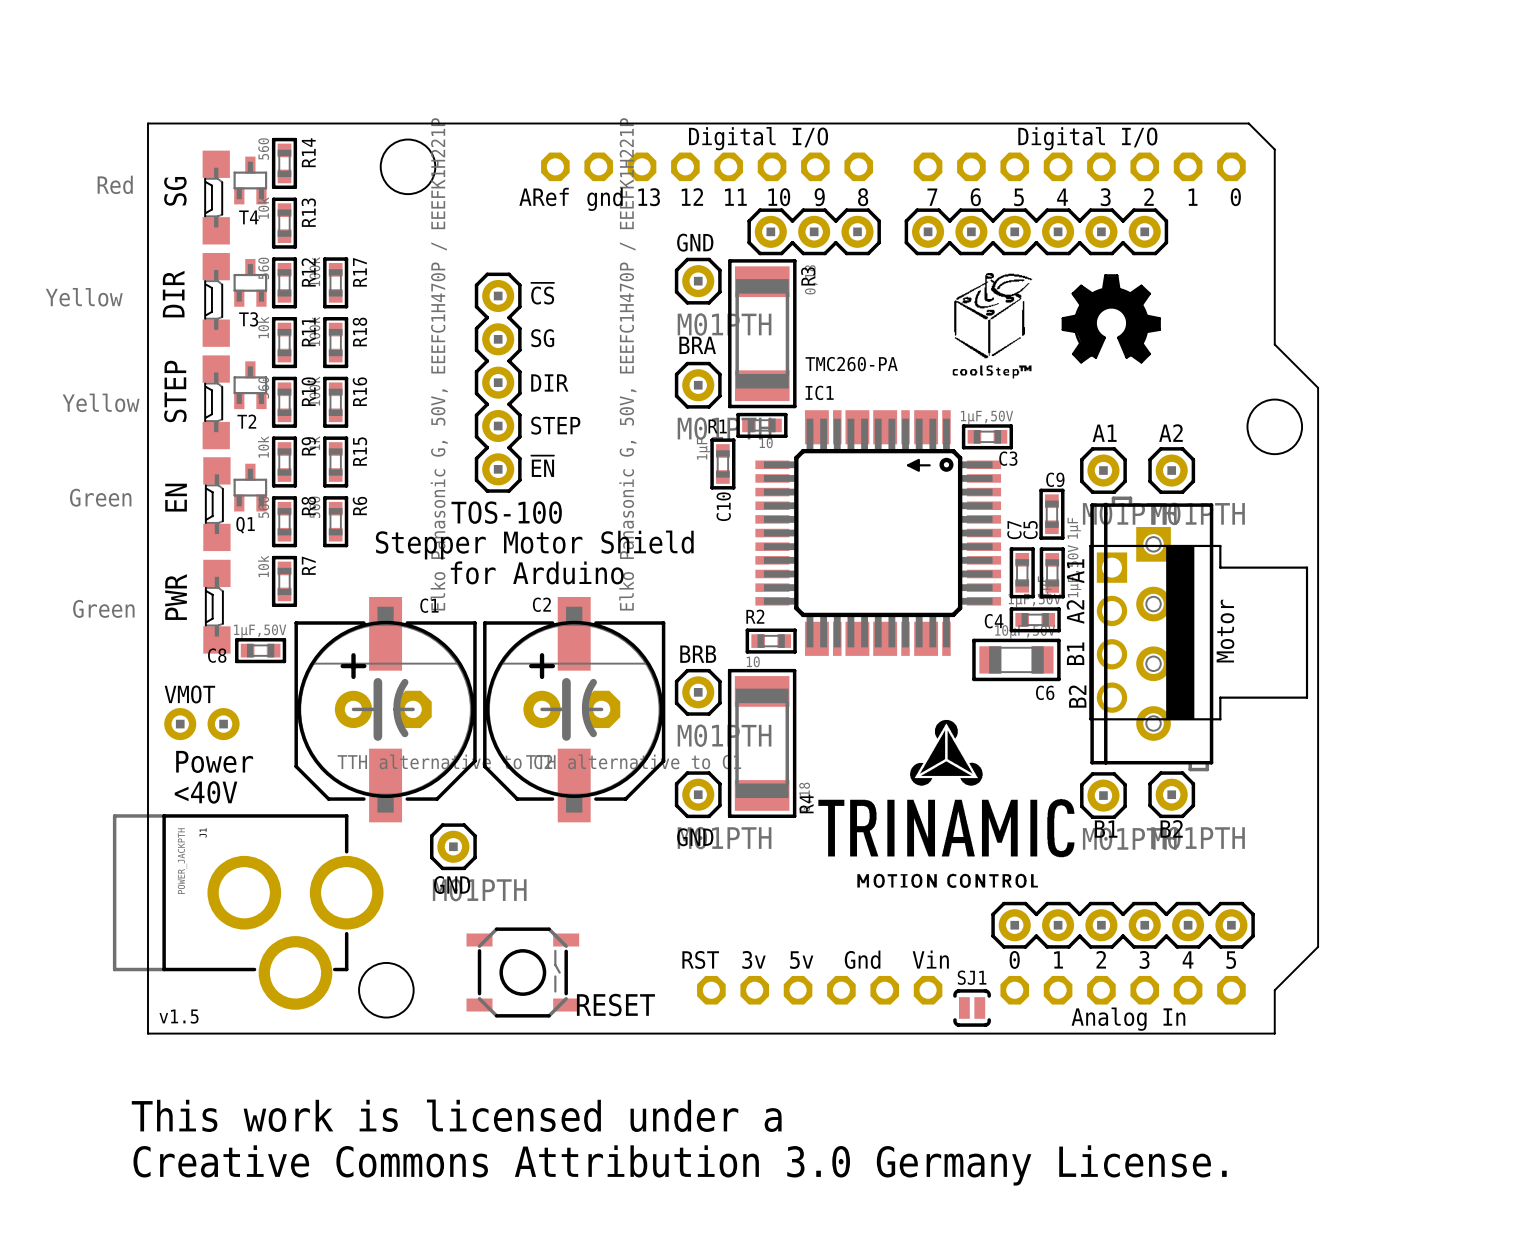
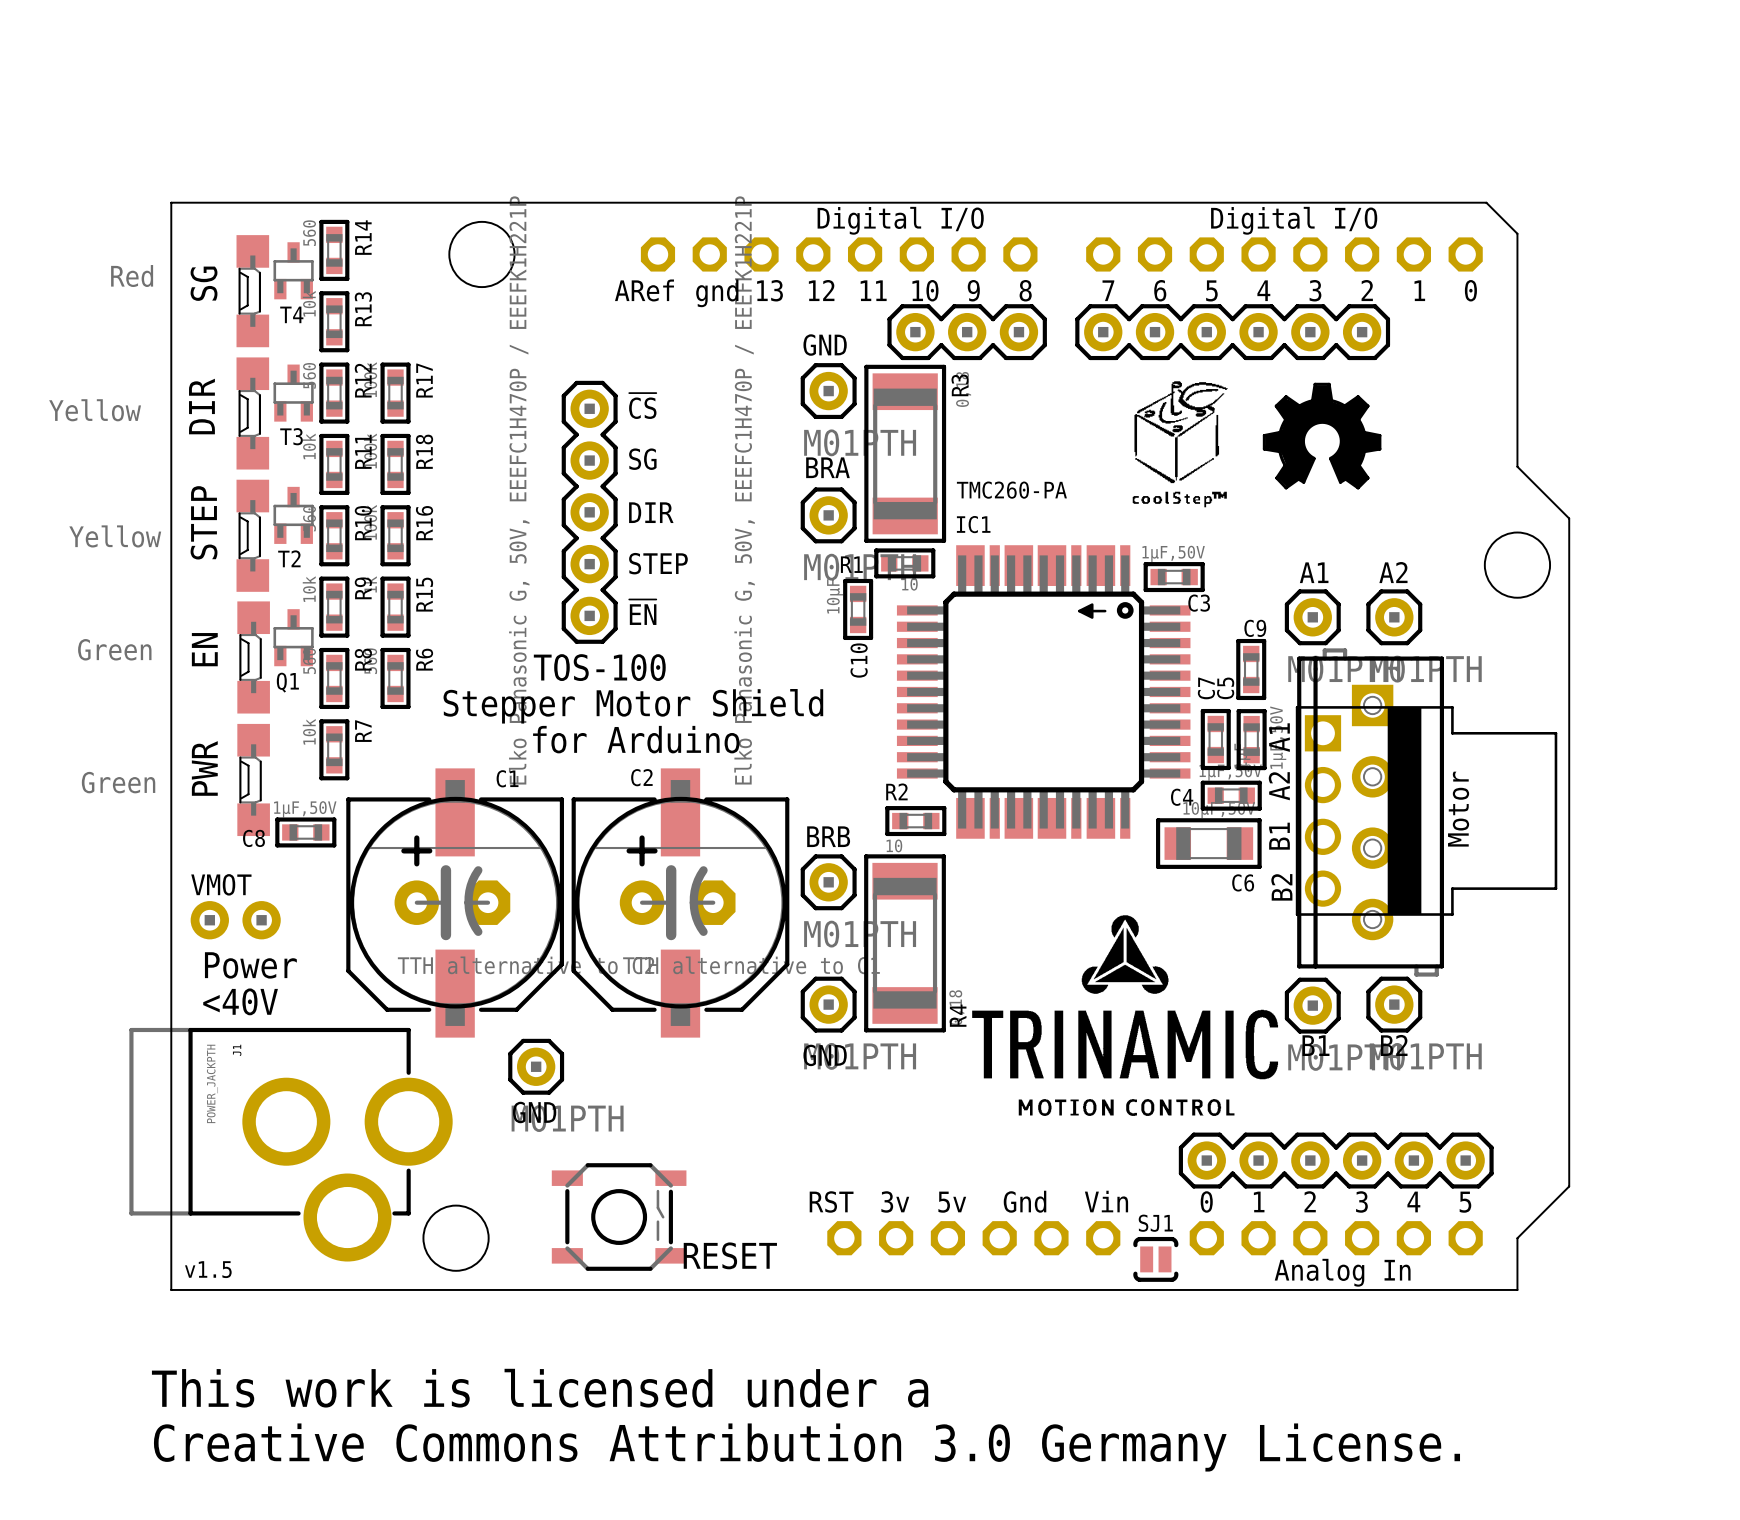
C10 value: 1µF (703, 449) -> 10µF (834, 596)
C9 value: 1µF (1074, 528) -> none

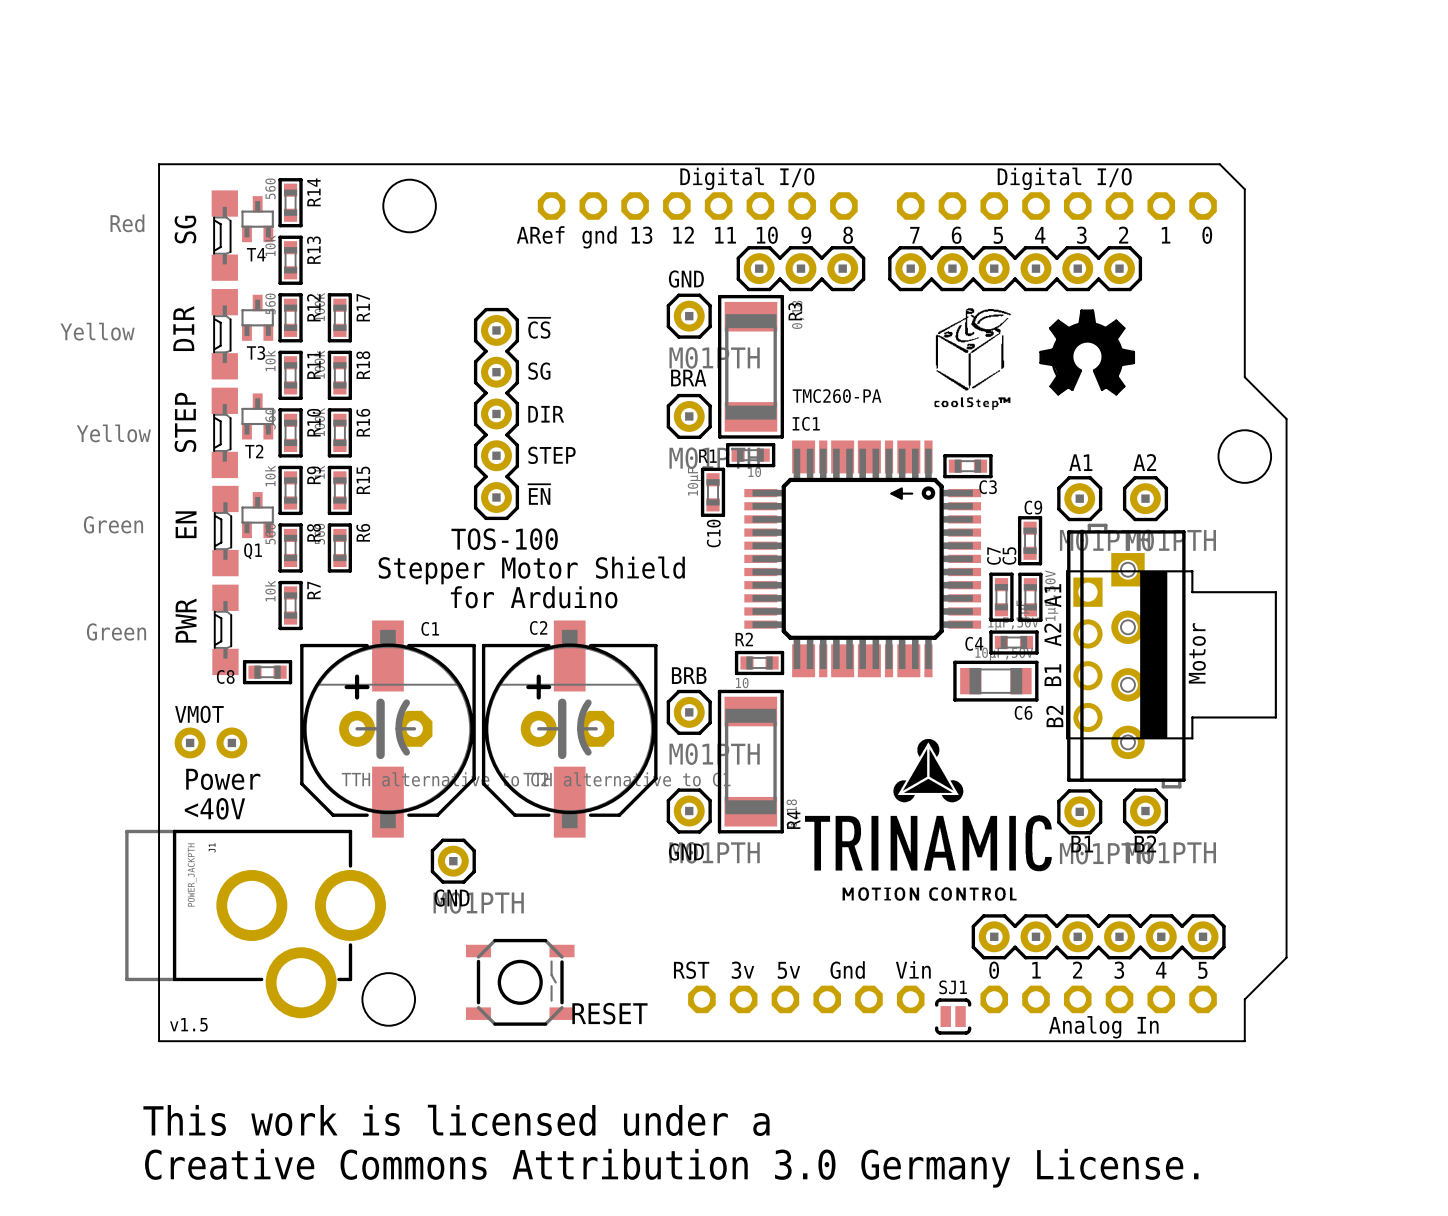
C1 value: Elko Panasonic G, 50V, EEEFC1H470P / EEEFK1H221P (519, 490) -> none
C2 value: Elko Panasonic G, 50V, EEEFC1H470P / EEEFK1H221P (744, 490) -> none
C3 value: 1µF,50V (1173, 553) -> none
C8 value: 1µF,50V (305, 809) -> none

